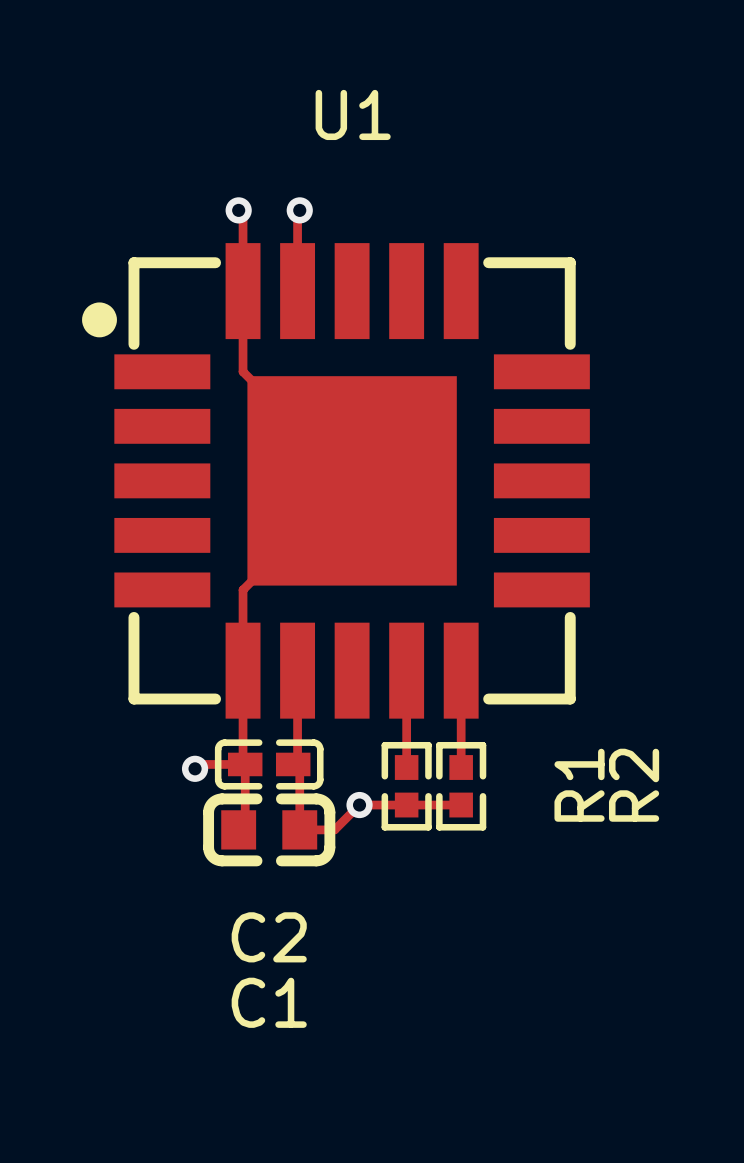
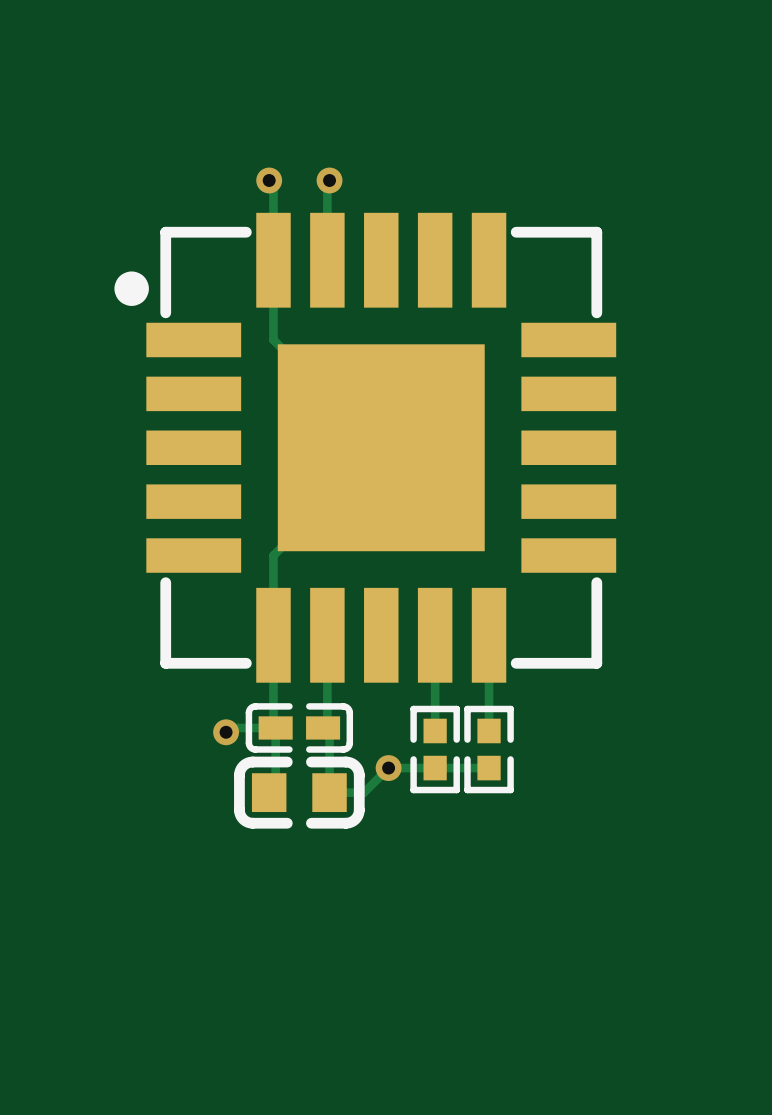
U1 name: U1 (353, 114) -> none
R1 name: R1 (579, 785) -> none
R2 name: R2 (634, 785) -> none
C2 name: C2 (269, 937) -> none
C1 name: C1 (269, 1002) -> none

